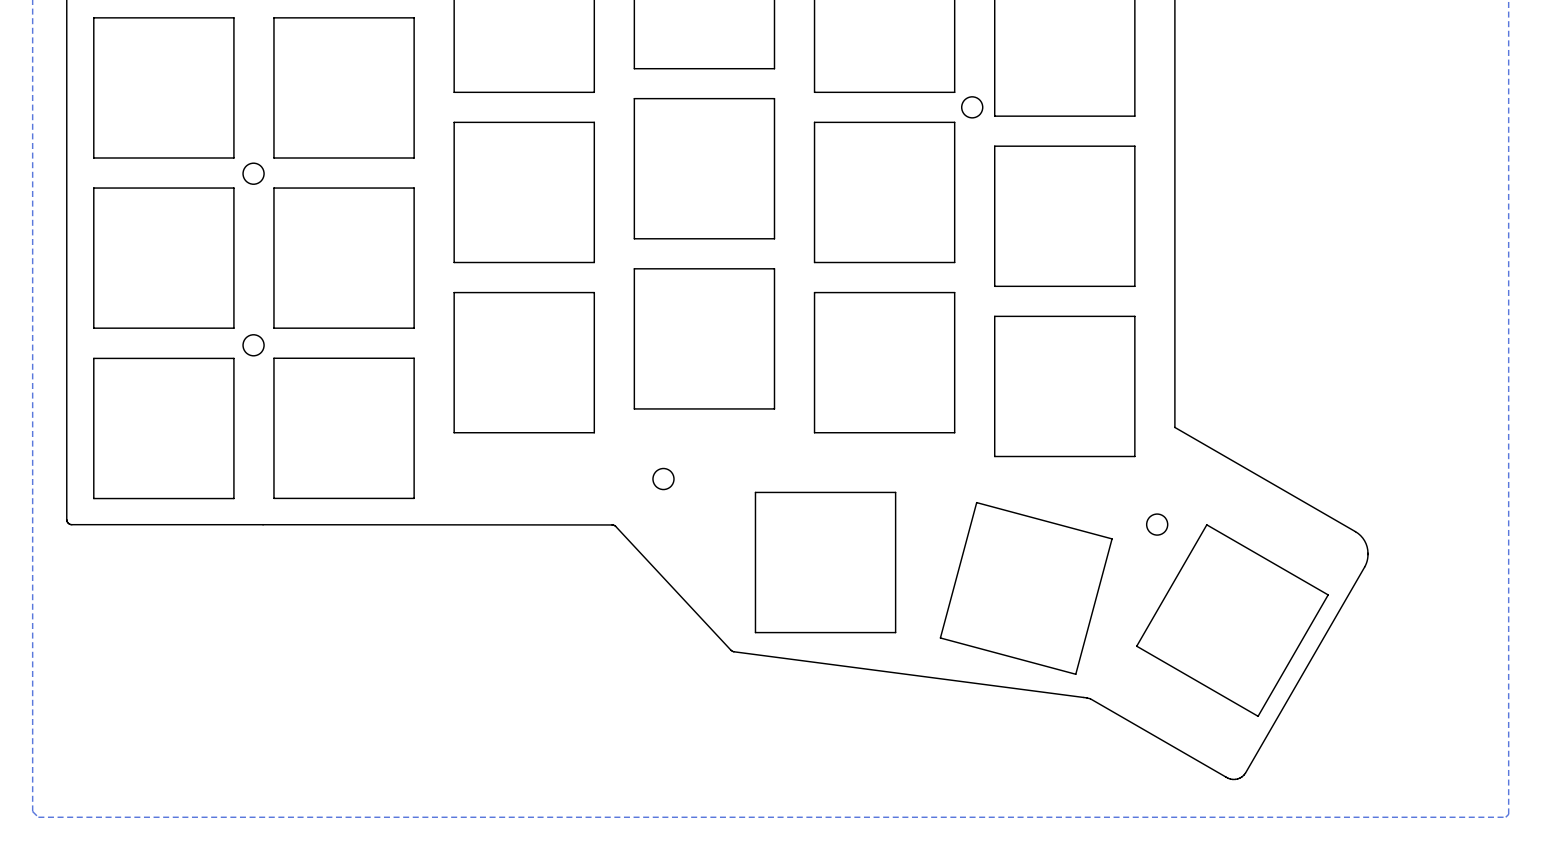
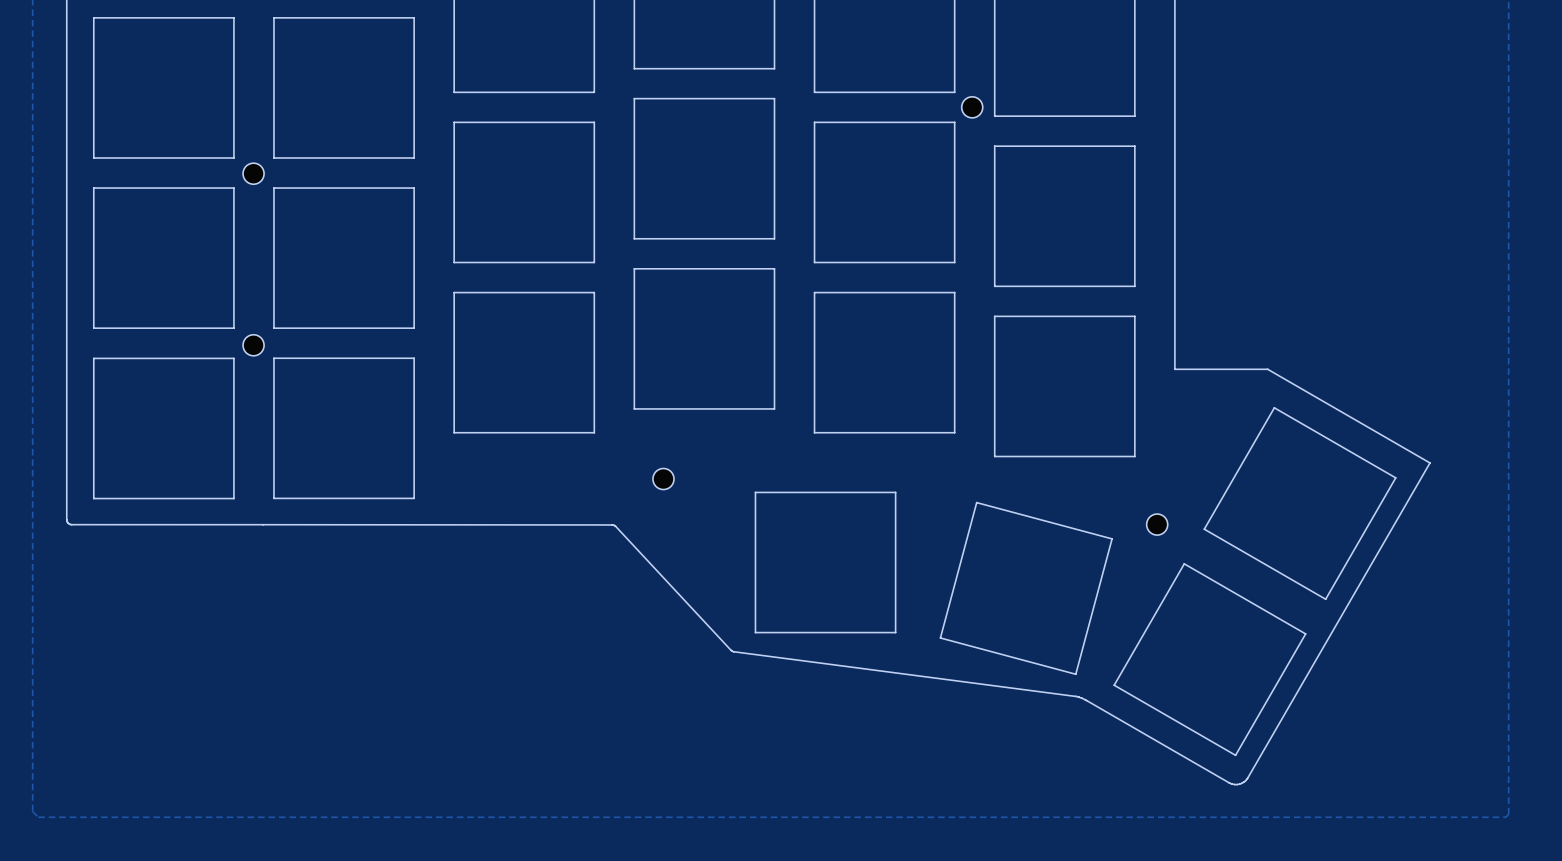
board edge: (1174, 369) (1174, 427) (1358, 533) (1367, 546) (1367, 561) (1245, 773) (1239, 778) (1228, 778) (1090, 698) (1078, 696) -> (1174, 369) (1267, 369) (1429, 462) (1243, 782) (1237, 784) (1230, 783) (1078, 696)
drawing: none -> [1203, 407, 1397, 600]
drawing position: (1232, 620) -> (1209, 659)

